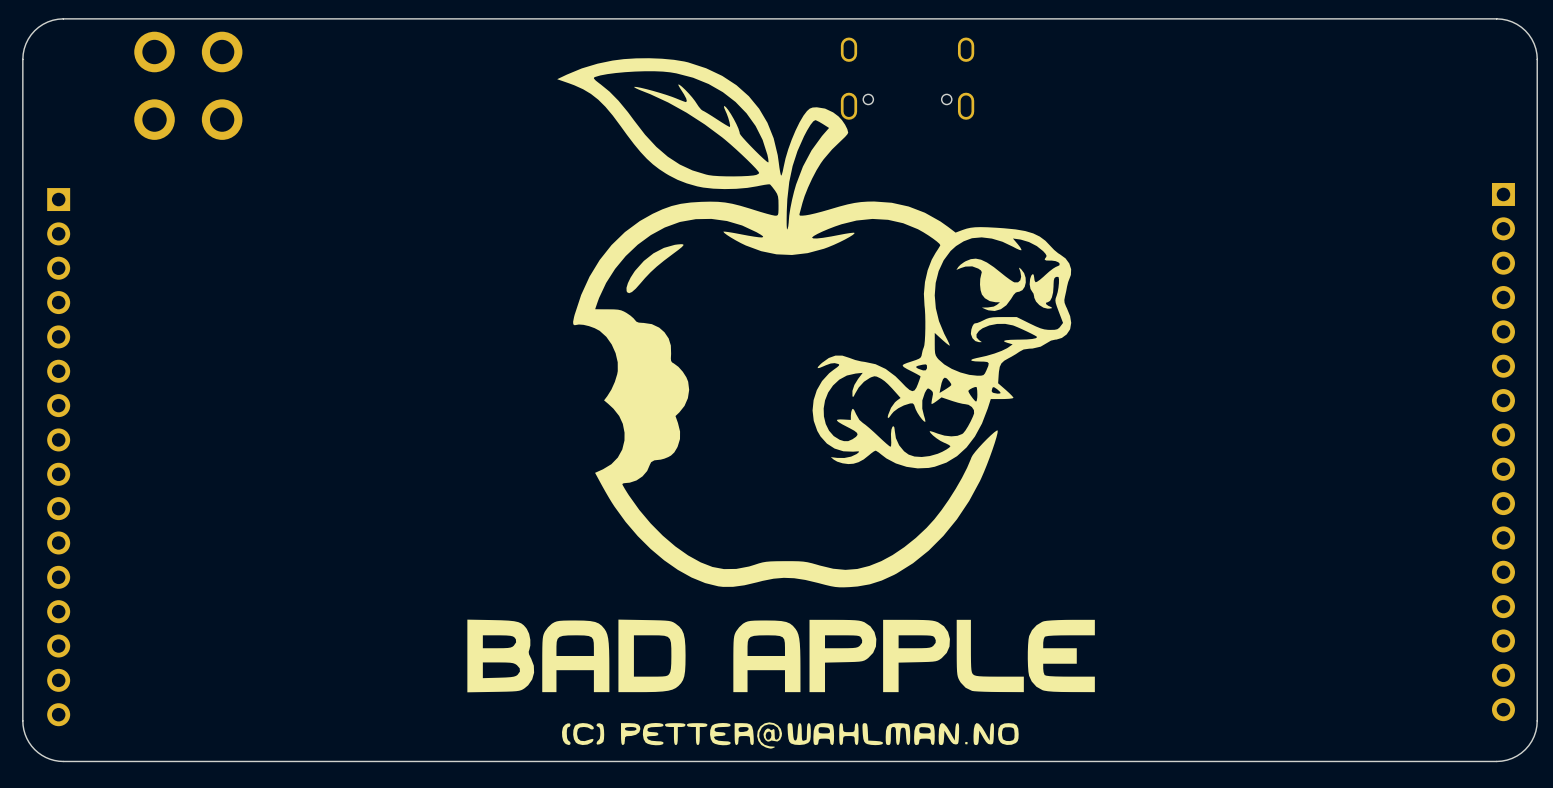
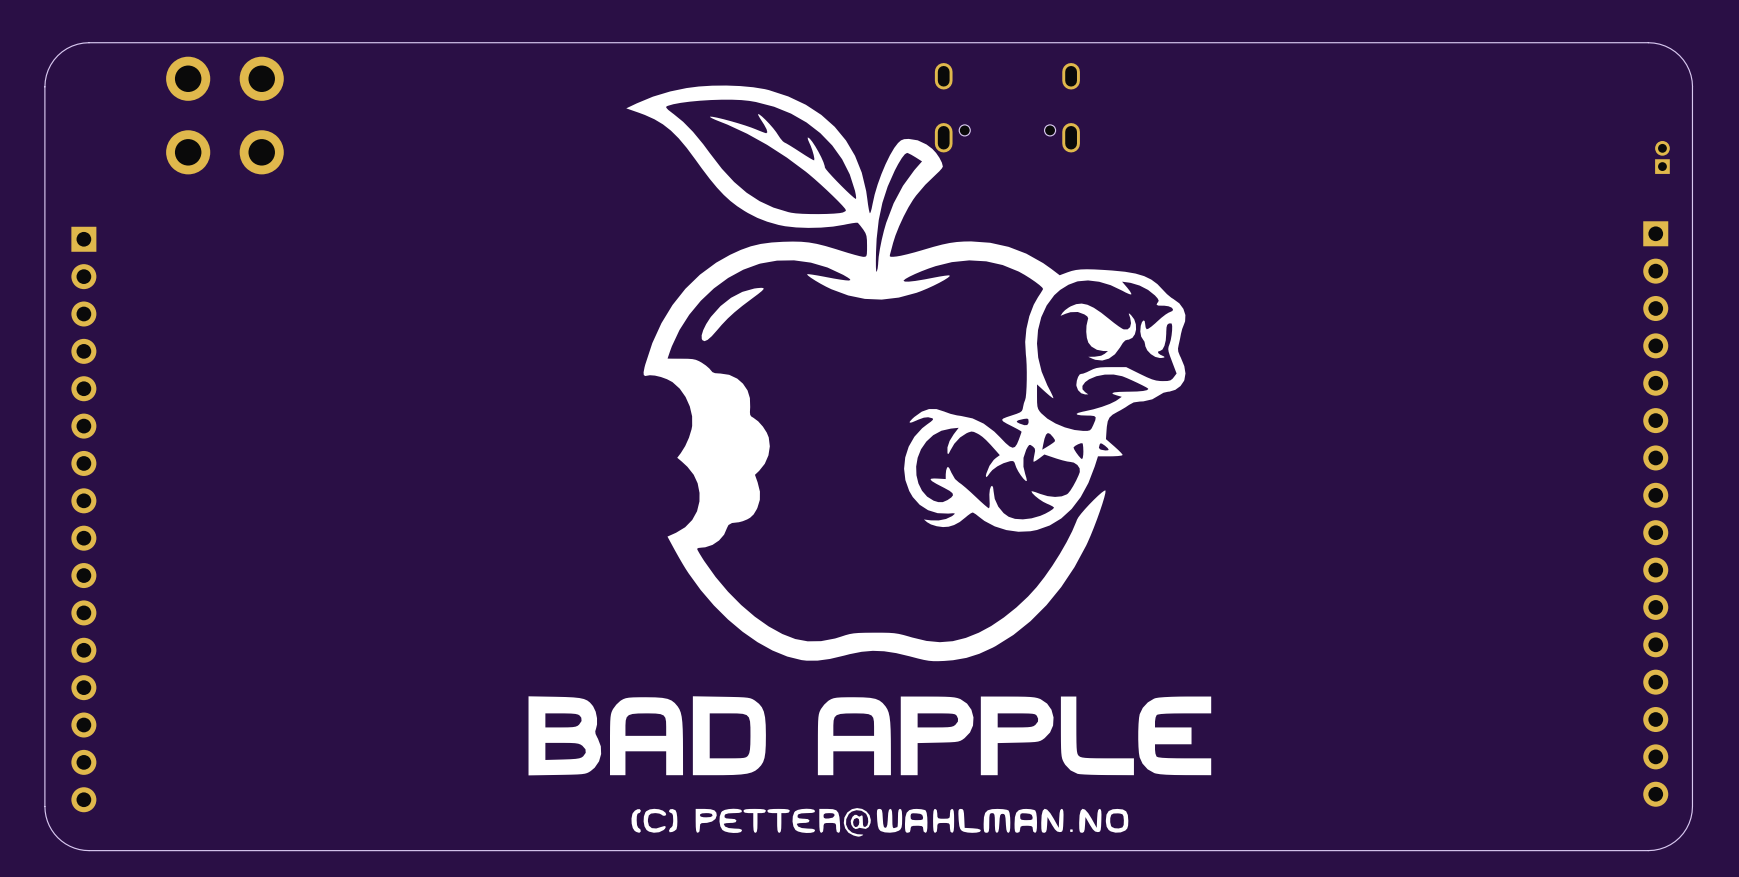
part: none -> (1662, 157)

